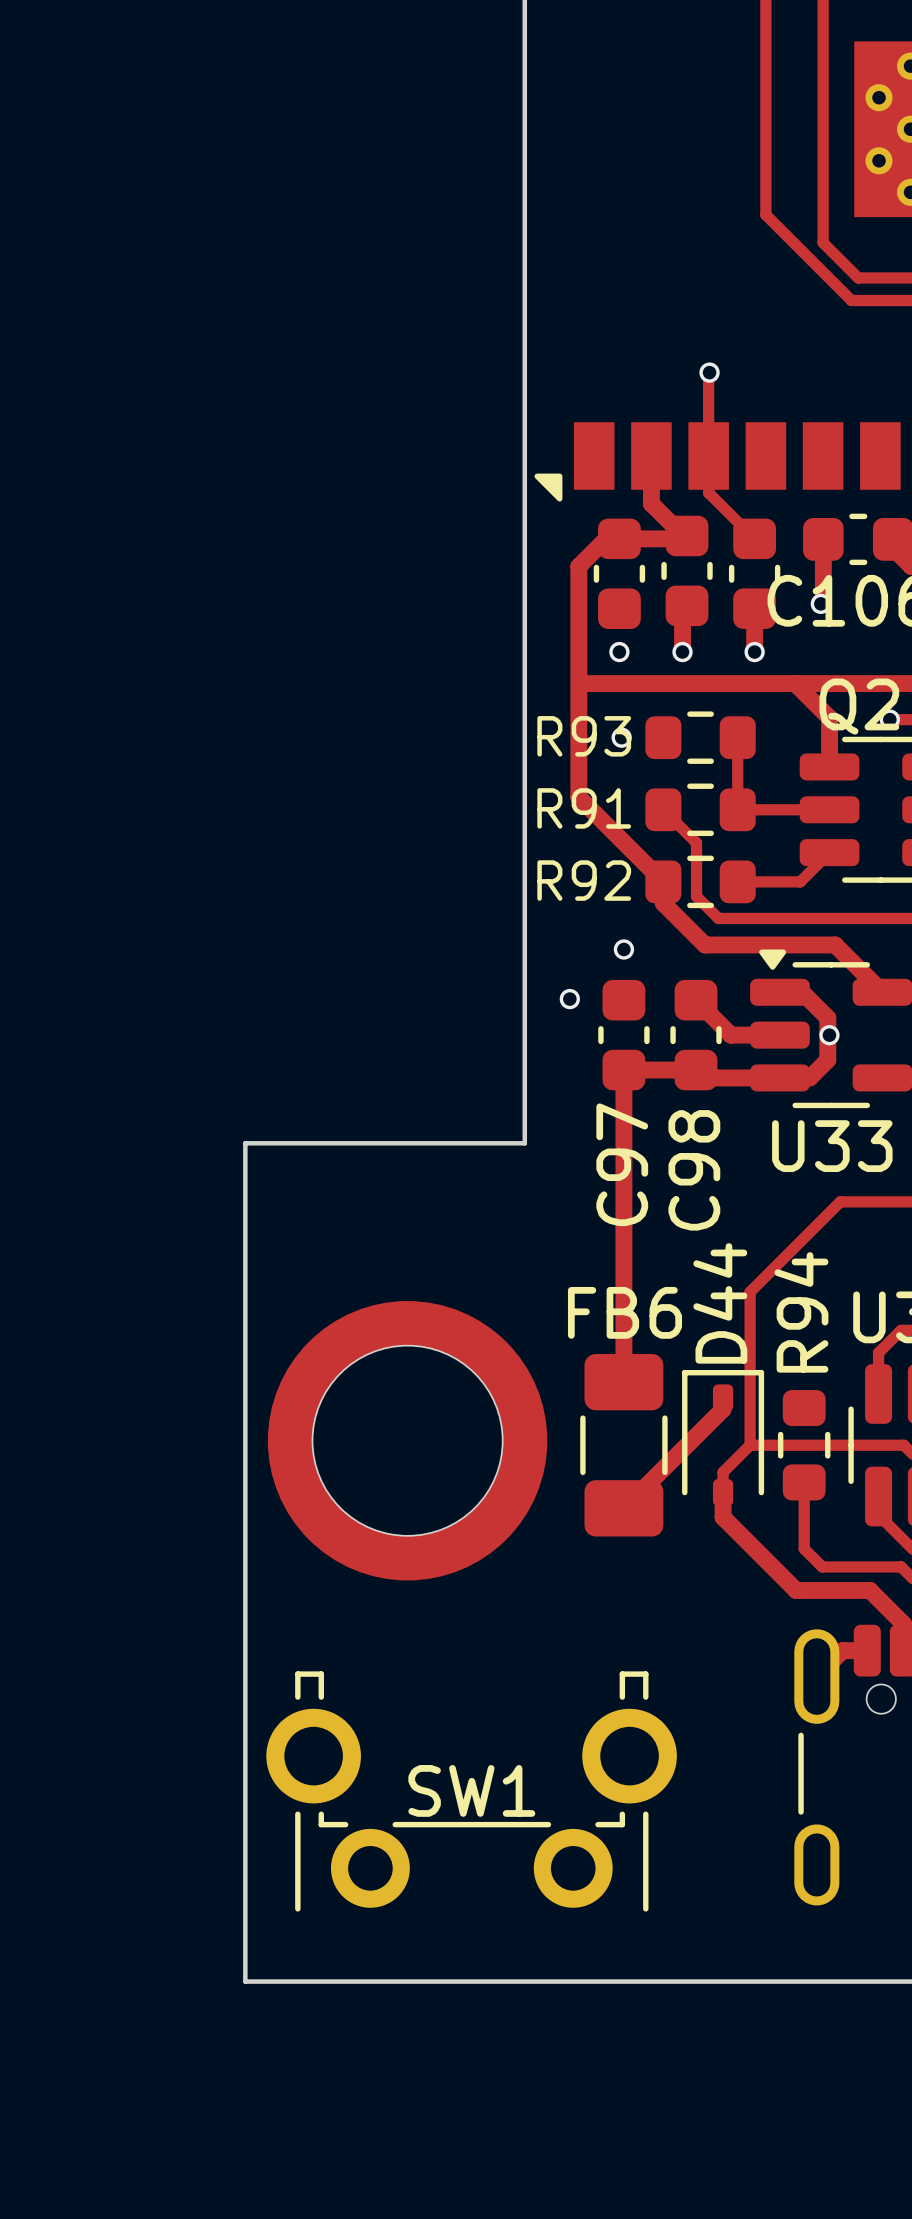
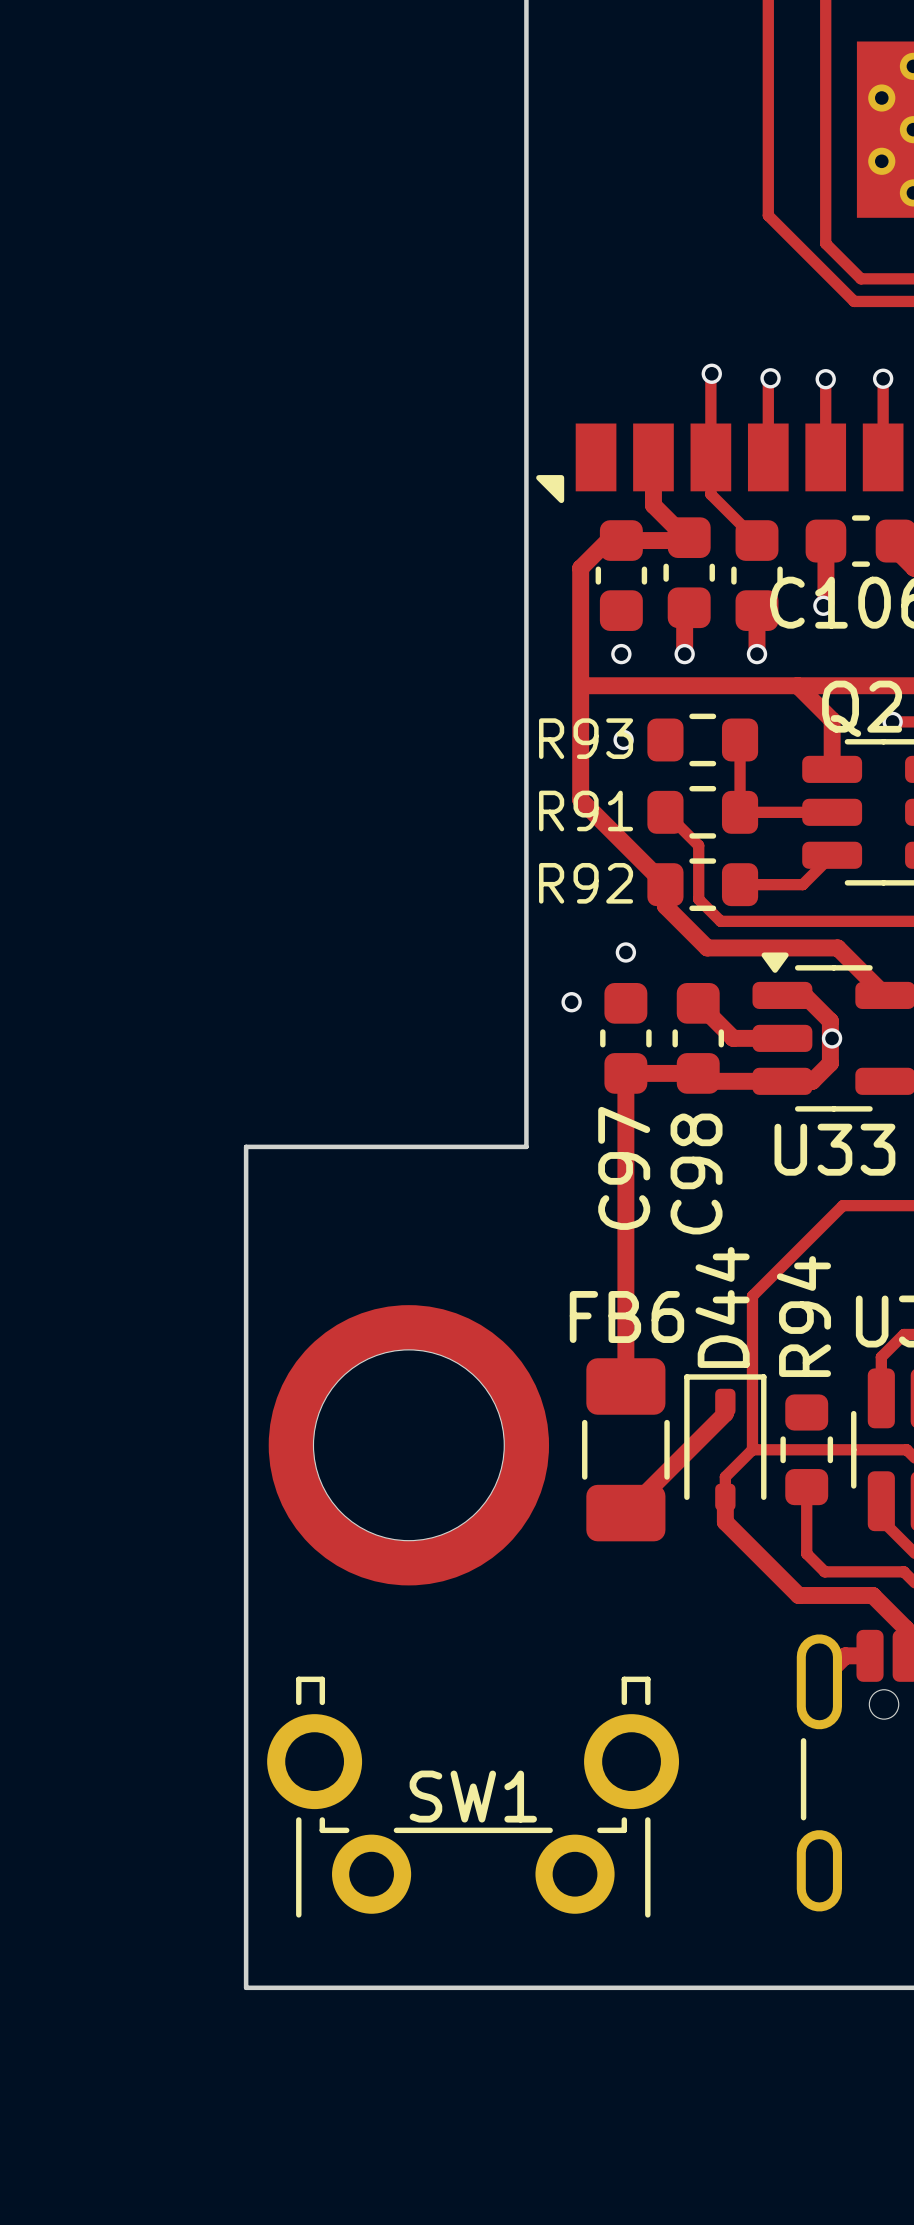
track: none -> (770, 378) (768, 380) (768, 457)
via: none -> (770, 378)
track: none -> (883, 378) (883, 457)
via: none -> (883, 378)
track: none -> (825, 379) (825, 457)
via: none -> (825, 379)

